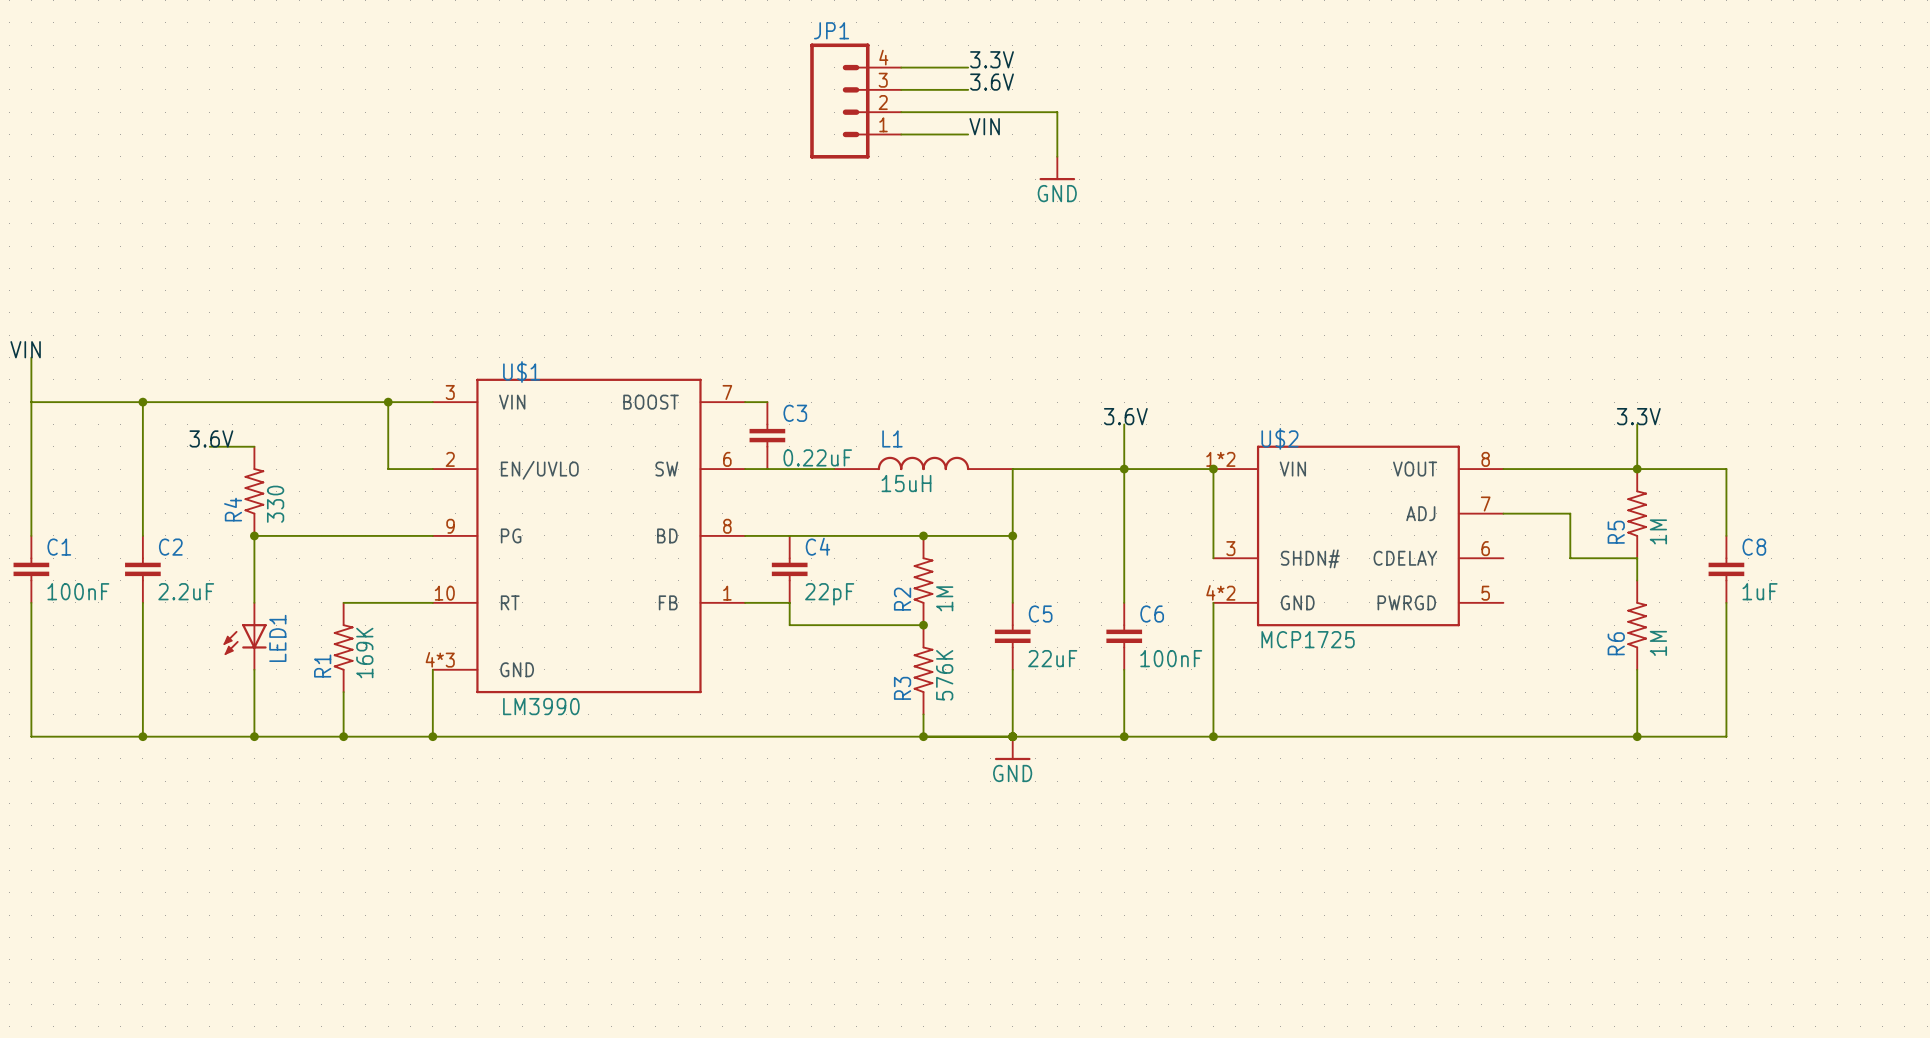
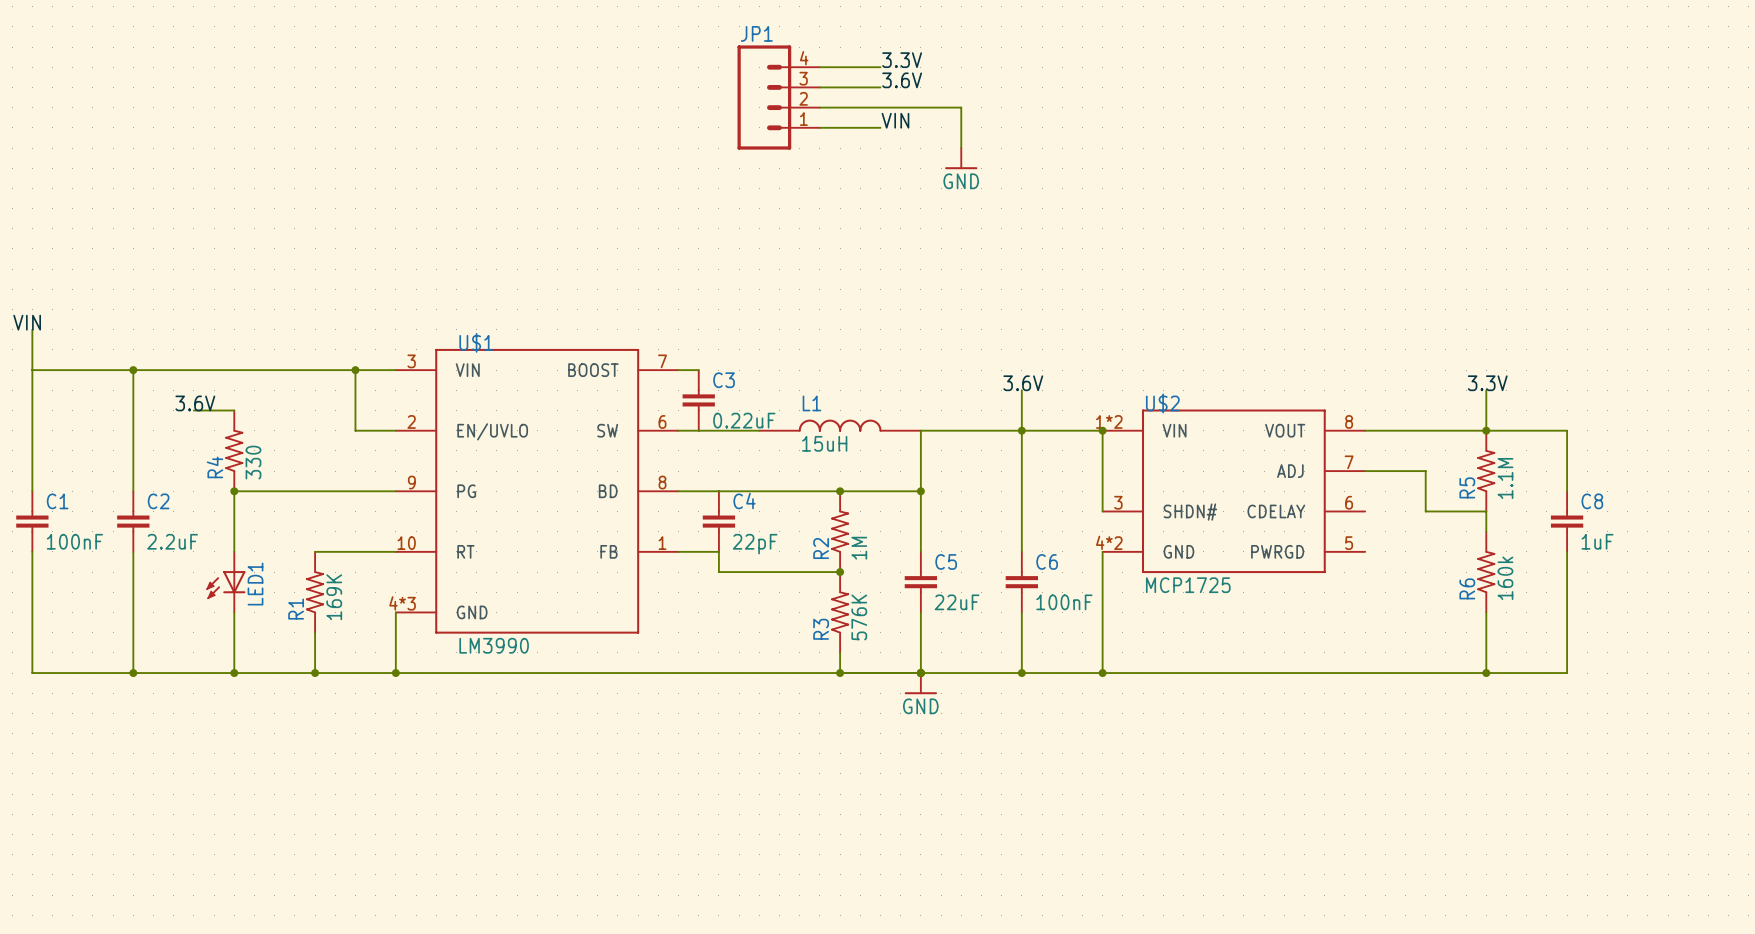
R5 value: 1M (1658, 531) -> 1.1M (1505, 478)
R6 value: 1M (1658, 643) -> 160k (1505, 578)

